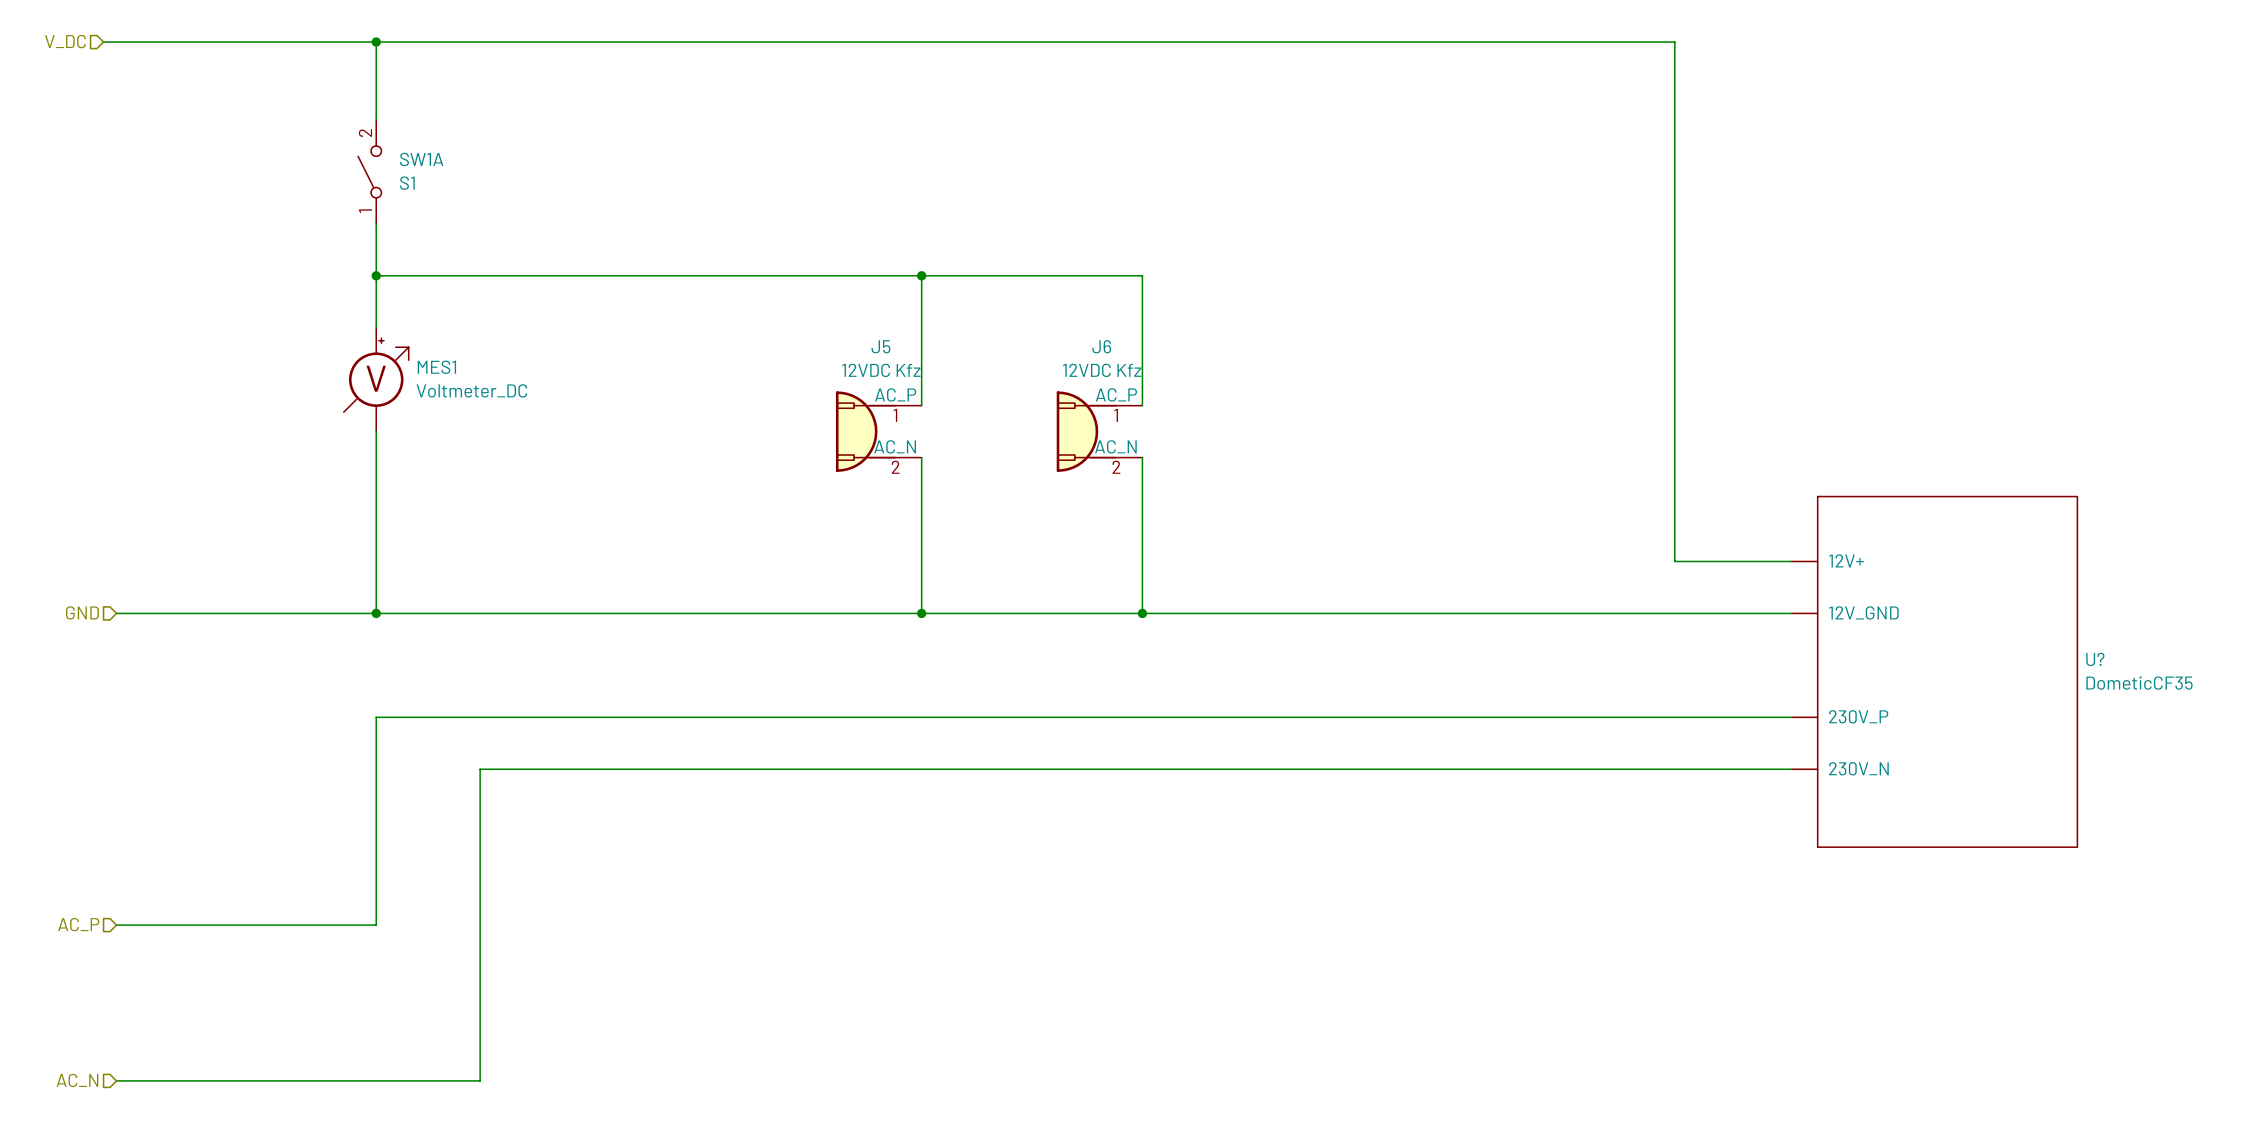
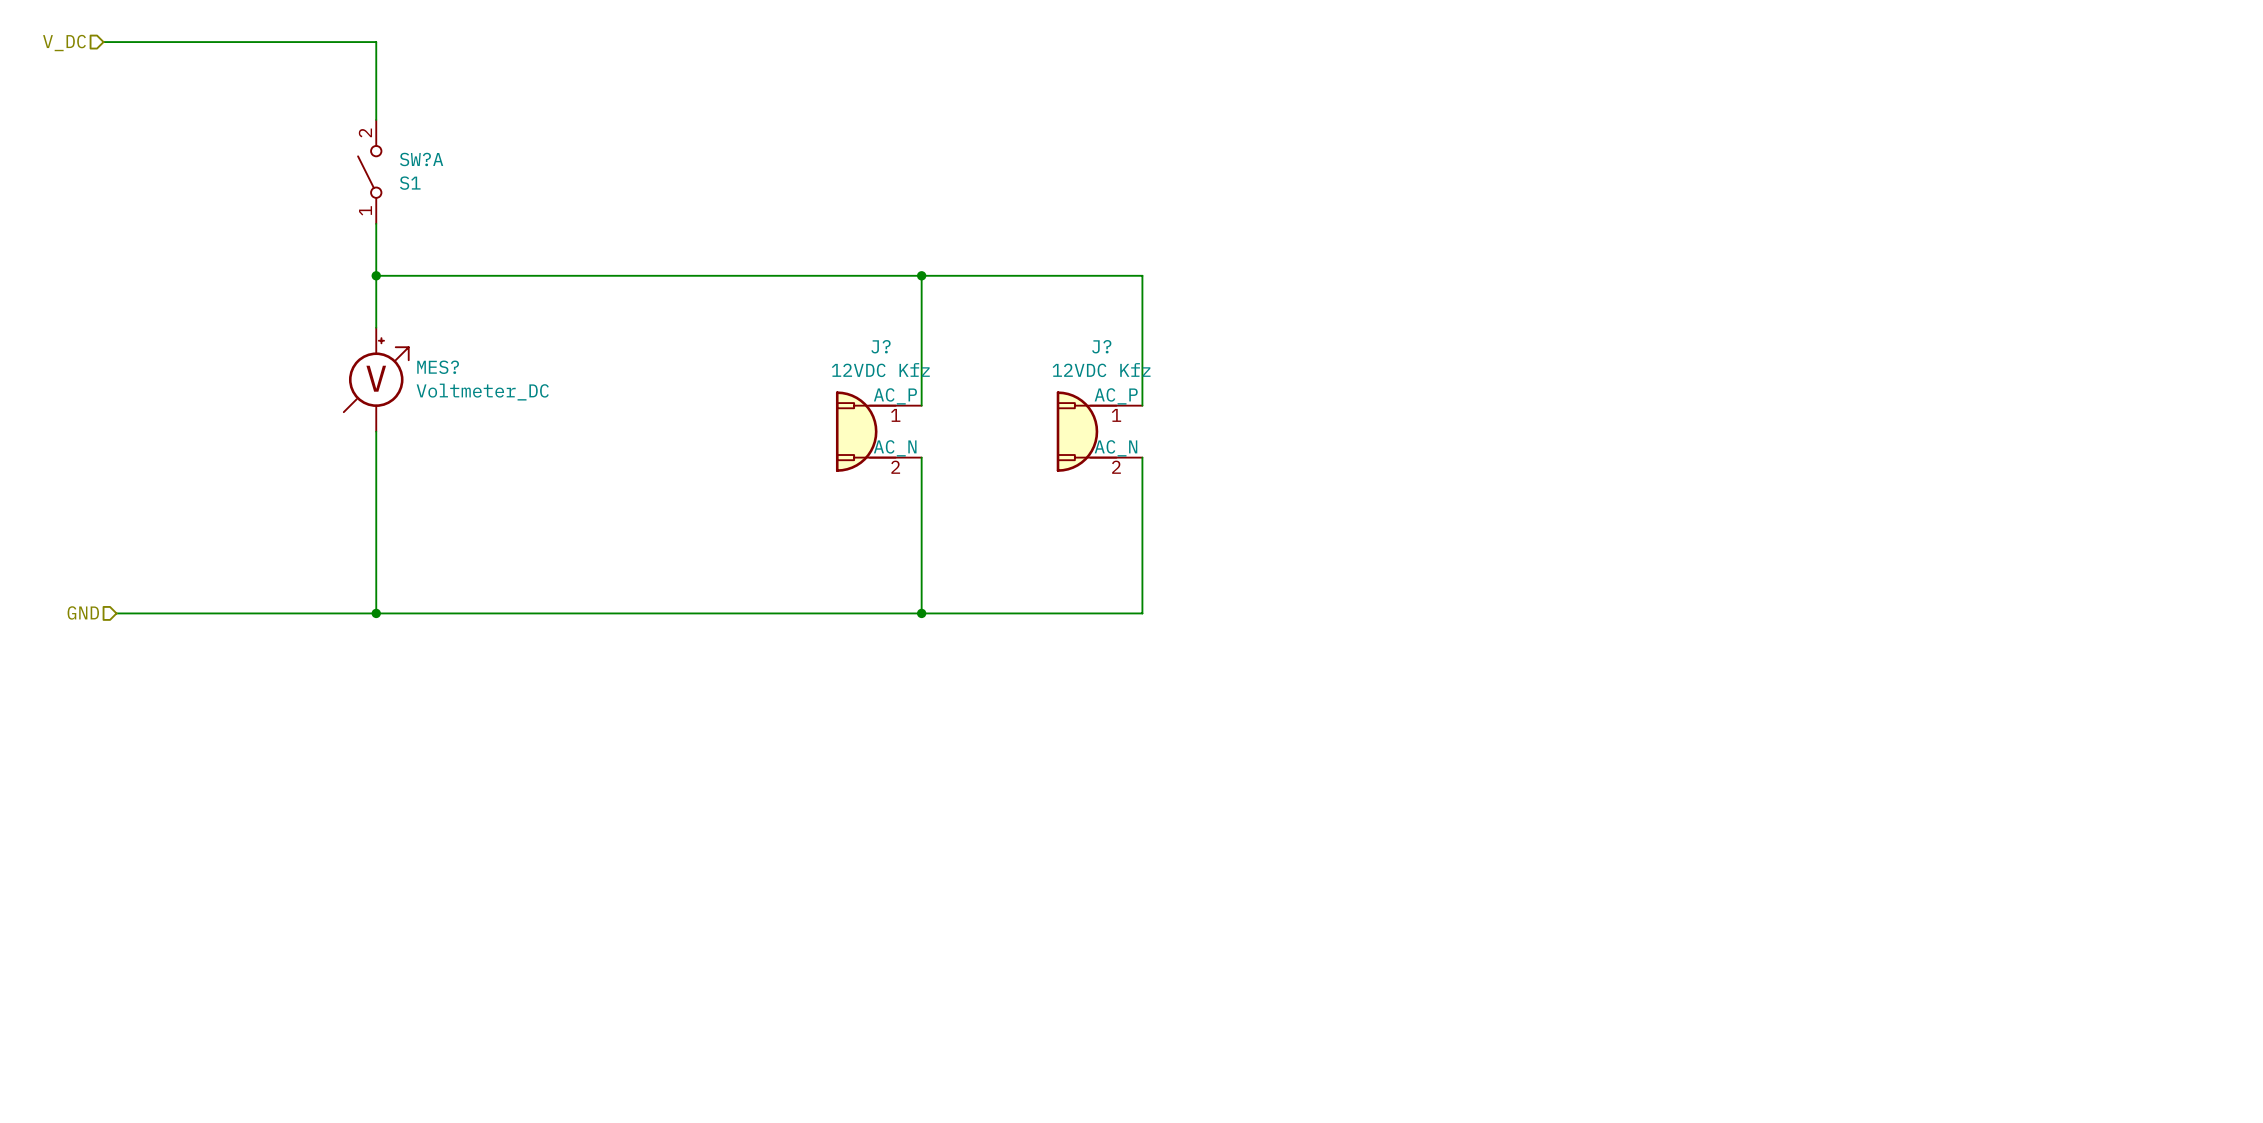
wire: (376, 42) (1674, 42) (1674, 561) (1791, 561) -> none
junction: (376, 42) -> none
SW1A name: SW1A (421, 159) -> SW?A (421, 159)
J5 name: J5 (880, 346) -> J? (880, 346)
J6 name: J6 (1101, 346) -> J? (1101, 346)
MES1 name: MES1 (436, 367) -> MES? (438, 367)
wire: (1142, 613) (1791, 613) -> none
junction: (1142, 613) -> none
U?: DometicCF35 (1934, 671) -> none
wire: (1791, 717) (376, 717) (376, 925) (116, 925) -> none
wire: (1791, 769) (480, 769) (480, 1080) (116, 1080) -> none
hierarchical label: AC_P (78, 924) -> none
hierarchical label: AC_N (77, 1080) -> none

